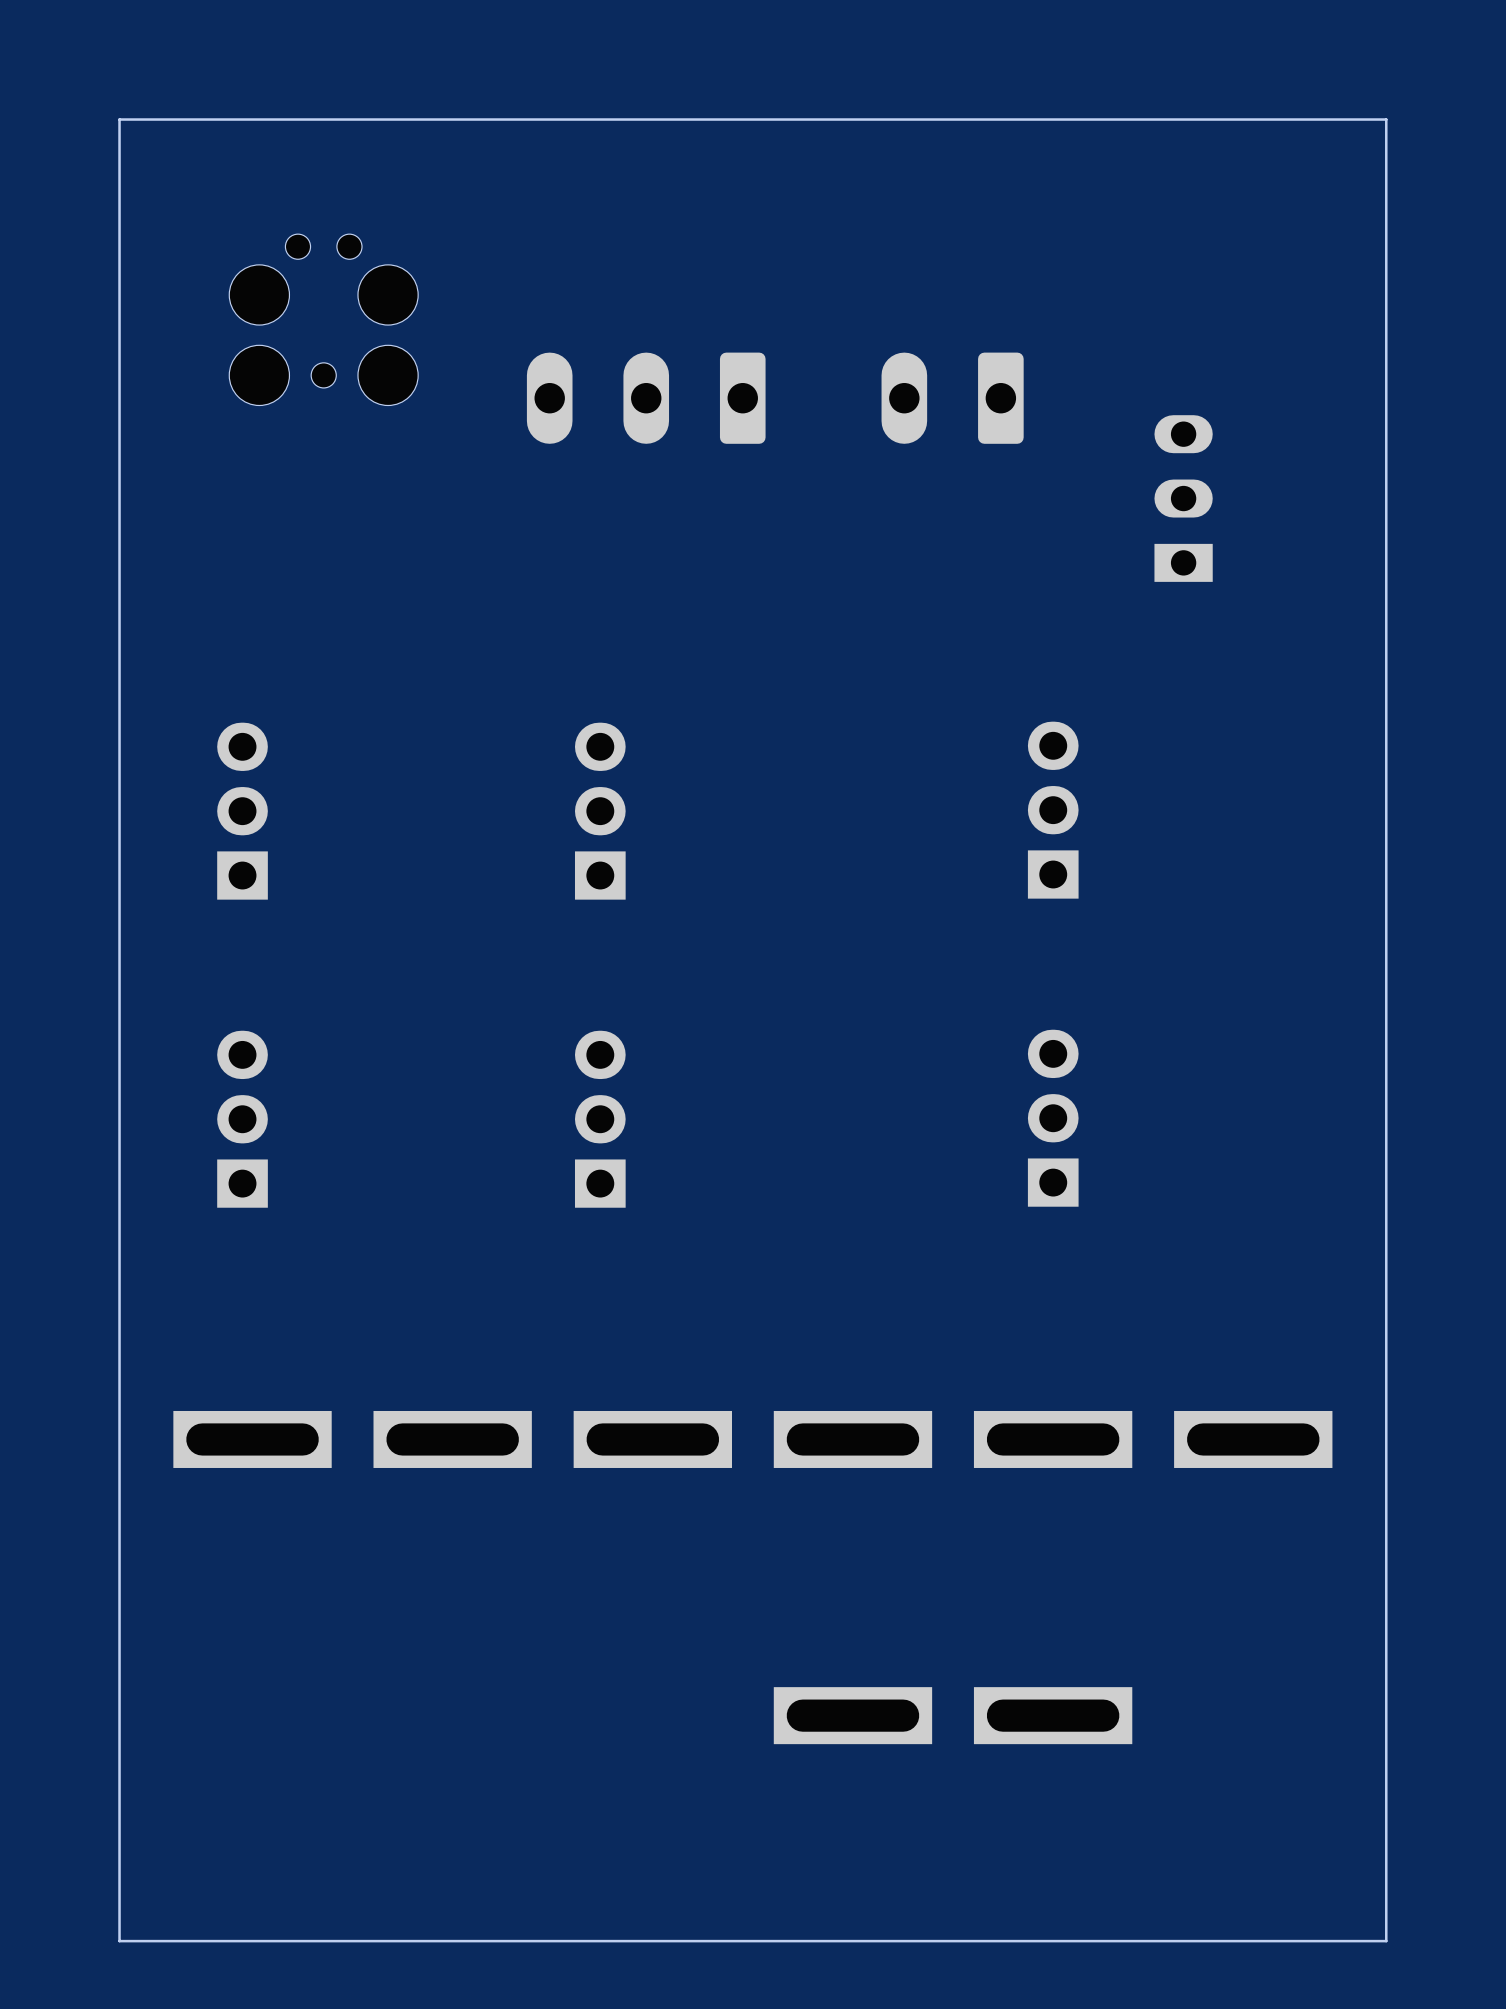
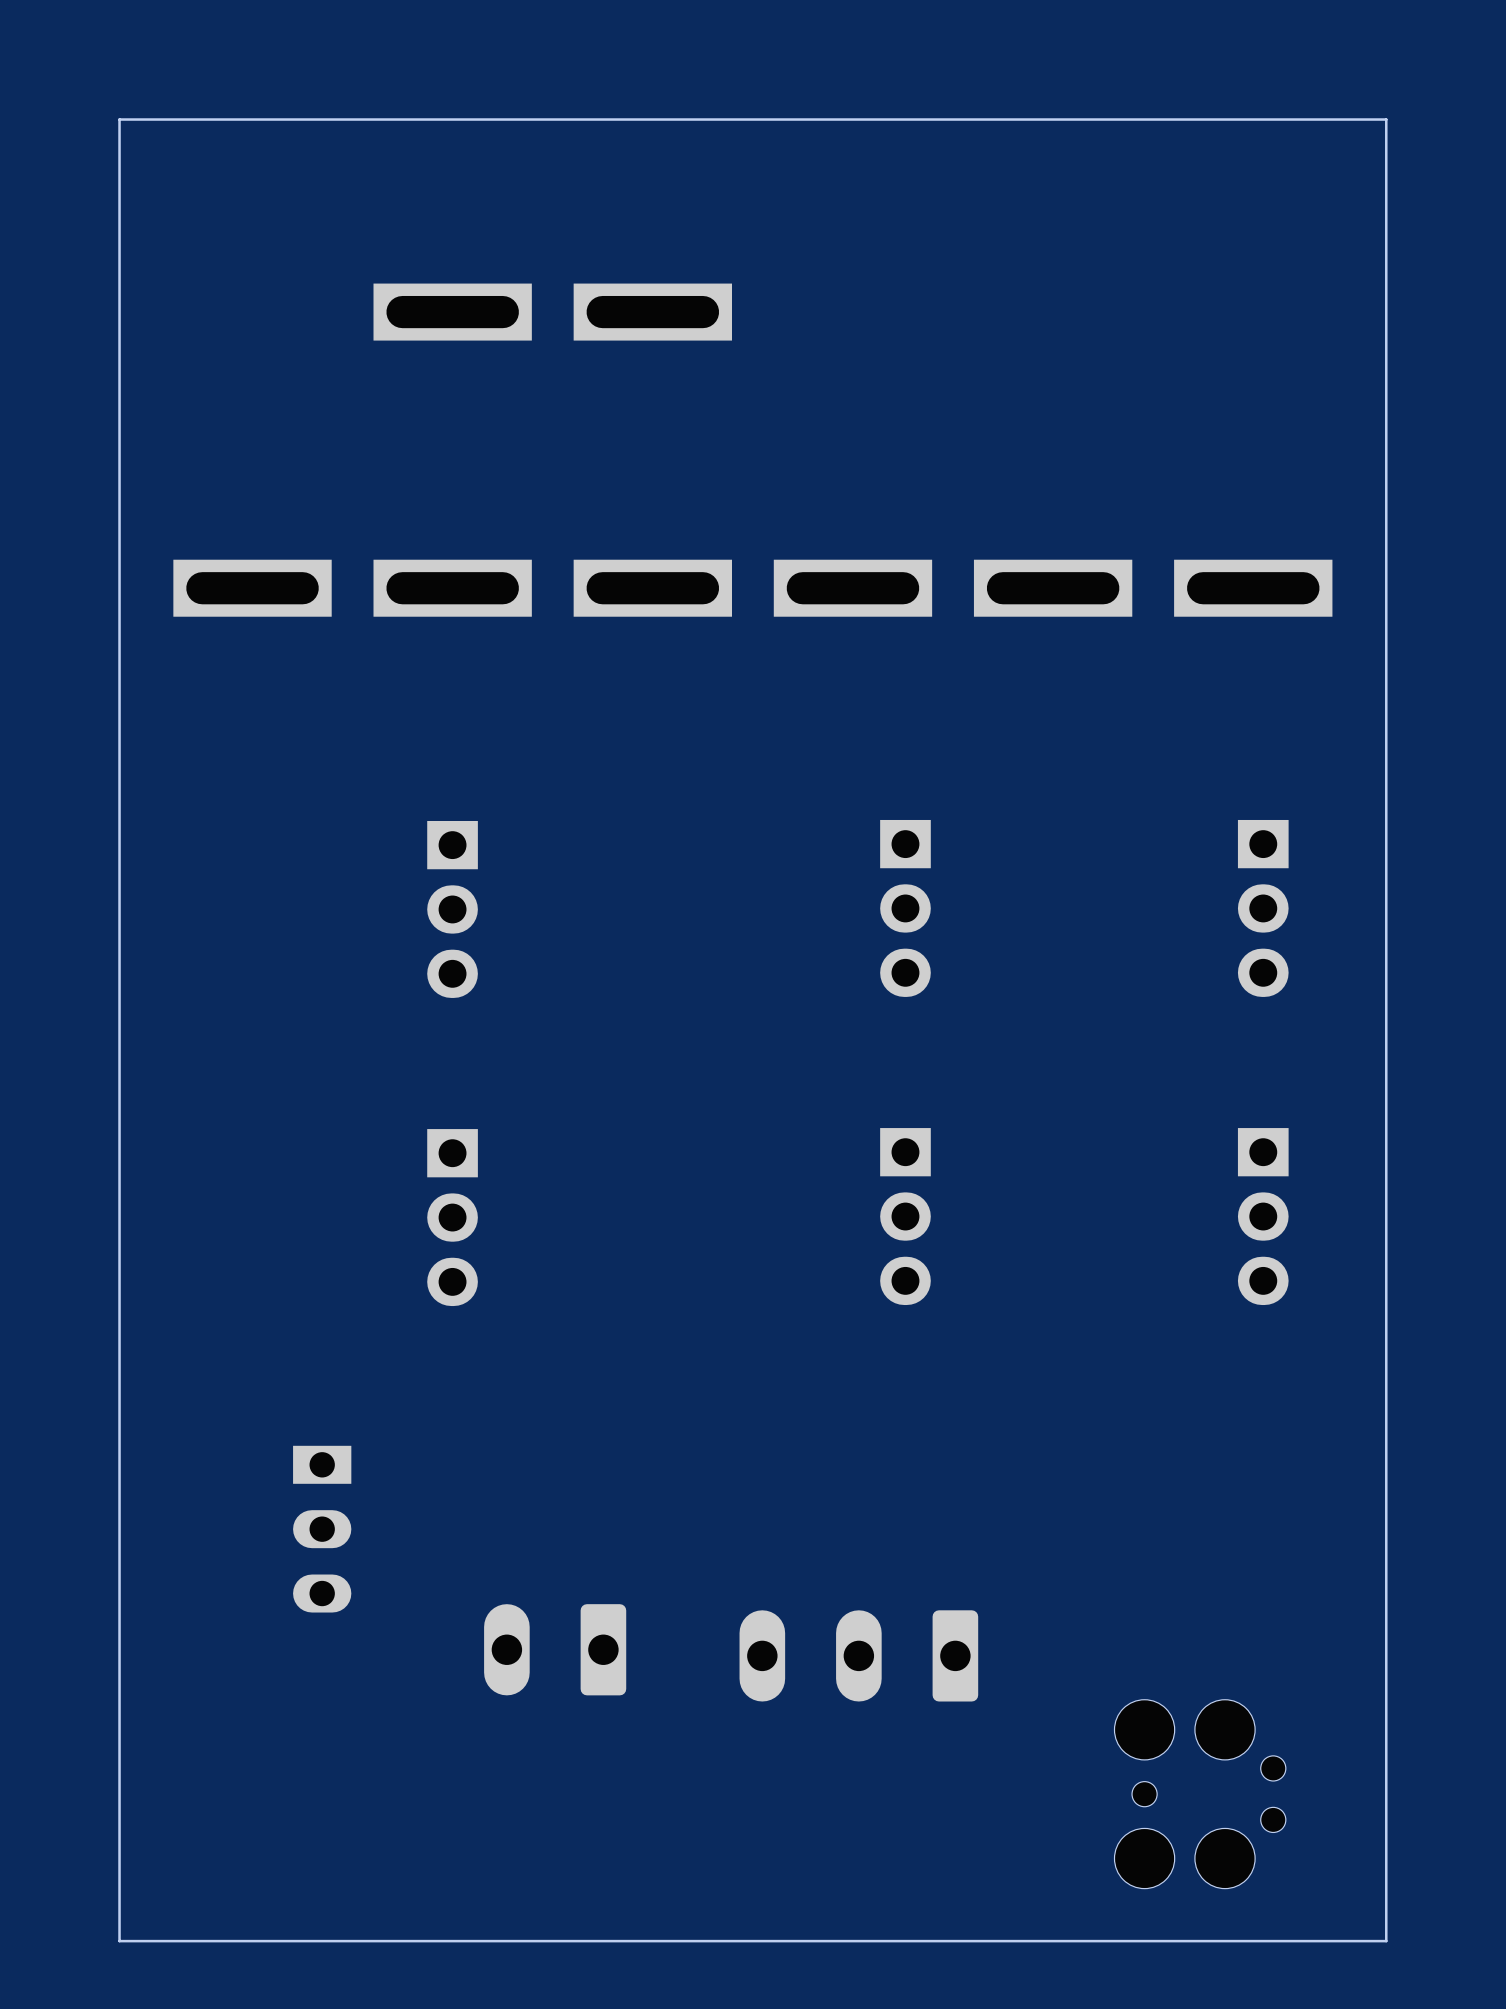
part: none -> (552, 312)
part: (323, 319) -> none
part: (646, 398) -> none
part: (952, 398) -> none
part: (1183, 498) -> none
part: none -> (352, 588)
part: none -> (752, 588)
part: none -> (1153, 588)
part: (1053, 810) -> none
part: (242, 811) -> none
part: (600, 811) -> none
part: none -> (905, 908)
part: none -> (1263, 908)
part: none -> (452, 909)
part: (1053, 1118) -> none
part: (242, 1119) -> none
part: (600, 1119) -> none
part: none -> (905, 1216)
part: none -> (1263, 1216)
part: none -> (452, 1217)
part: (352, 1439) -> none
part: (752, 1439) -> none
part: (1153, 1439) -> none
part: none -> (322, 1529)
part: none -> (555, 1649)
part: none -> (858, 1655)
part: (953, 1715) -> none
part: none -> (1200, 1794)

